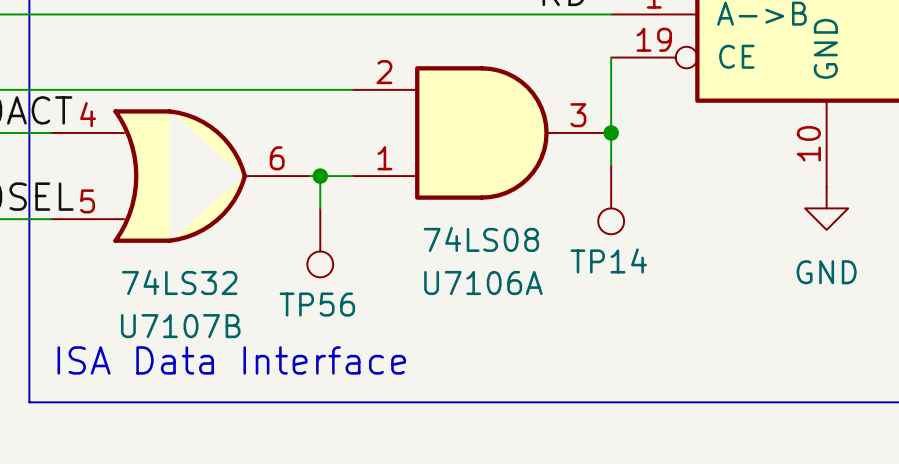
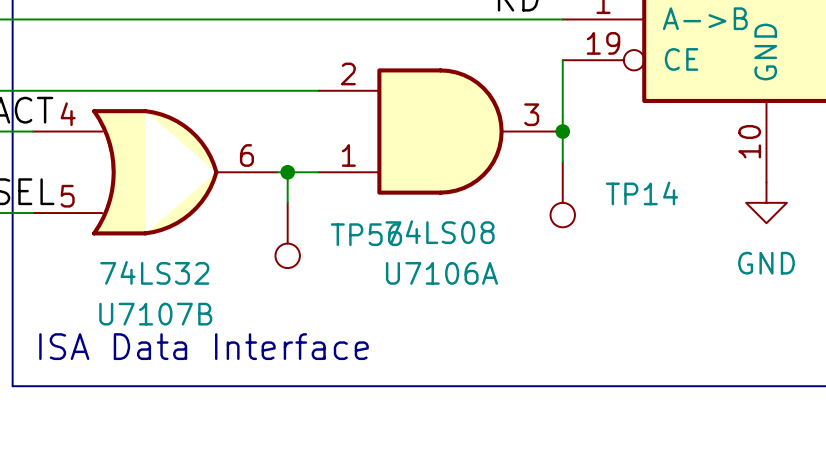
TP14 name position: TP14 (608, 260) -> TP14 (641, 193)
TP56 name position: TP56 (317, 304) -> TP56 (366, 234)

